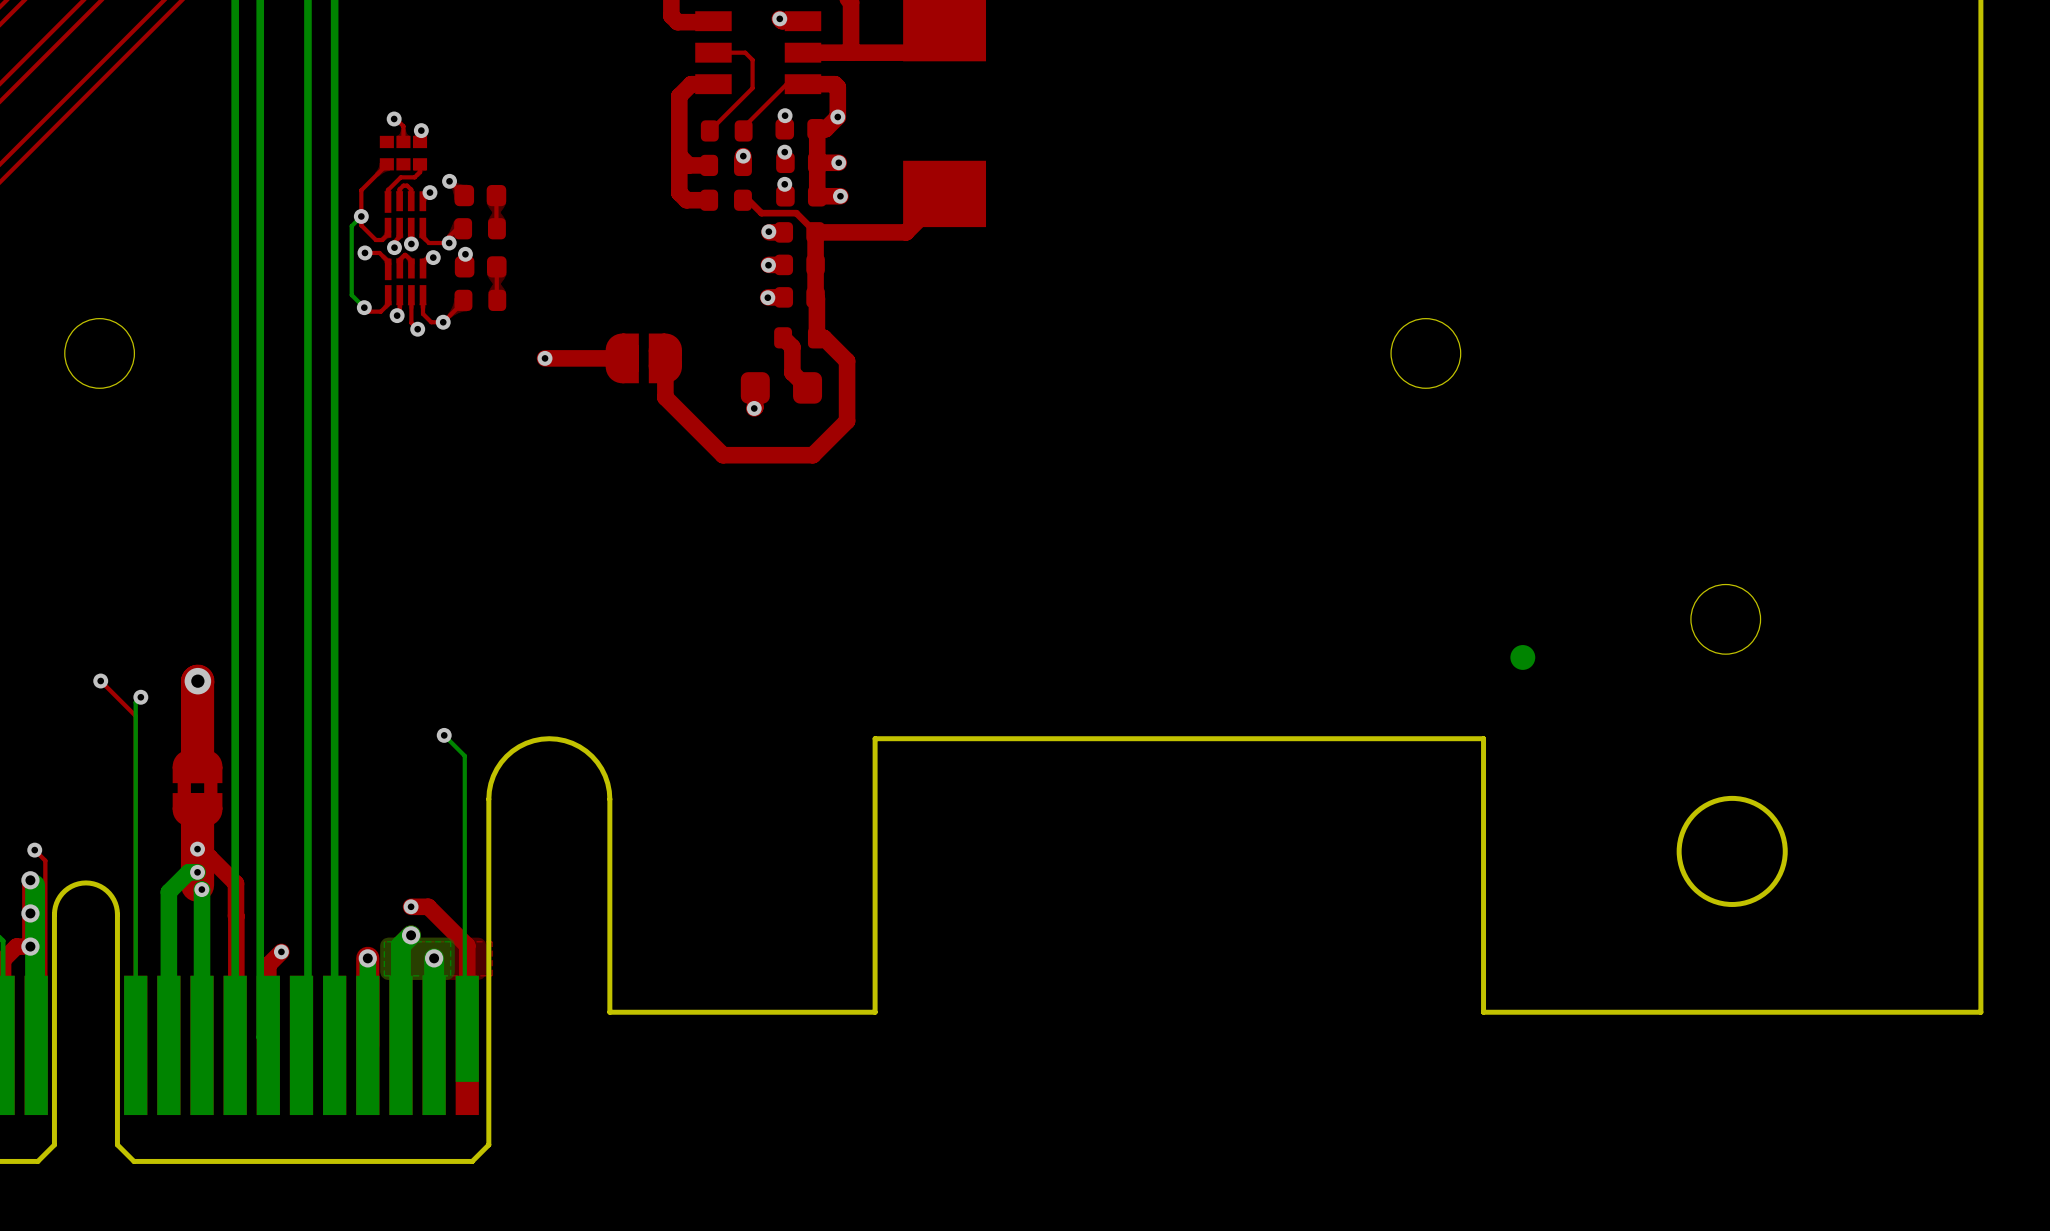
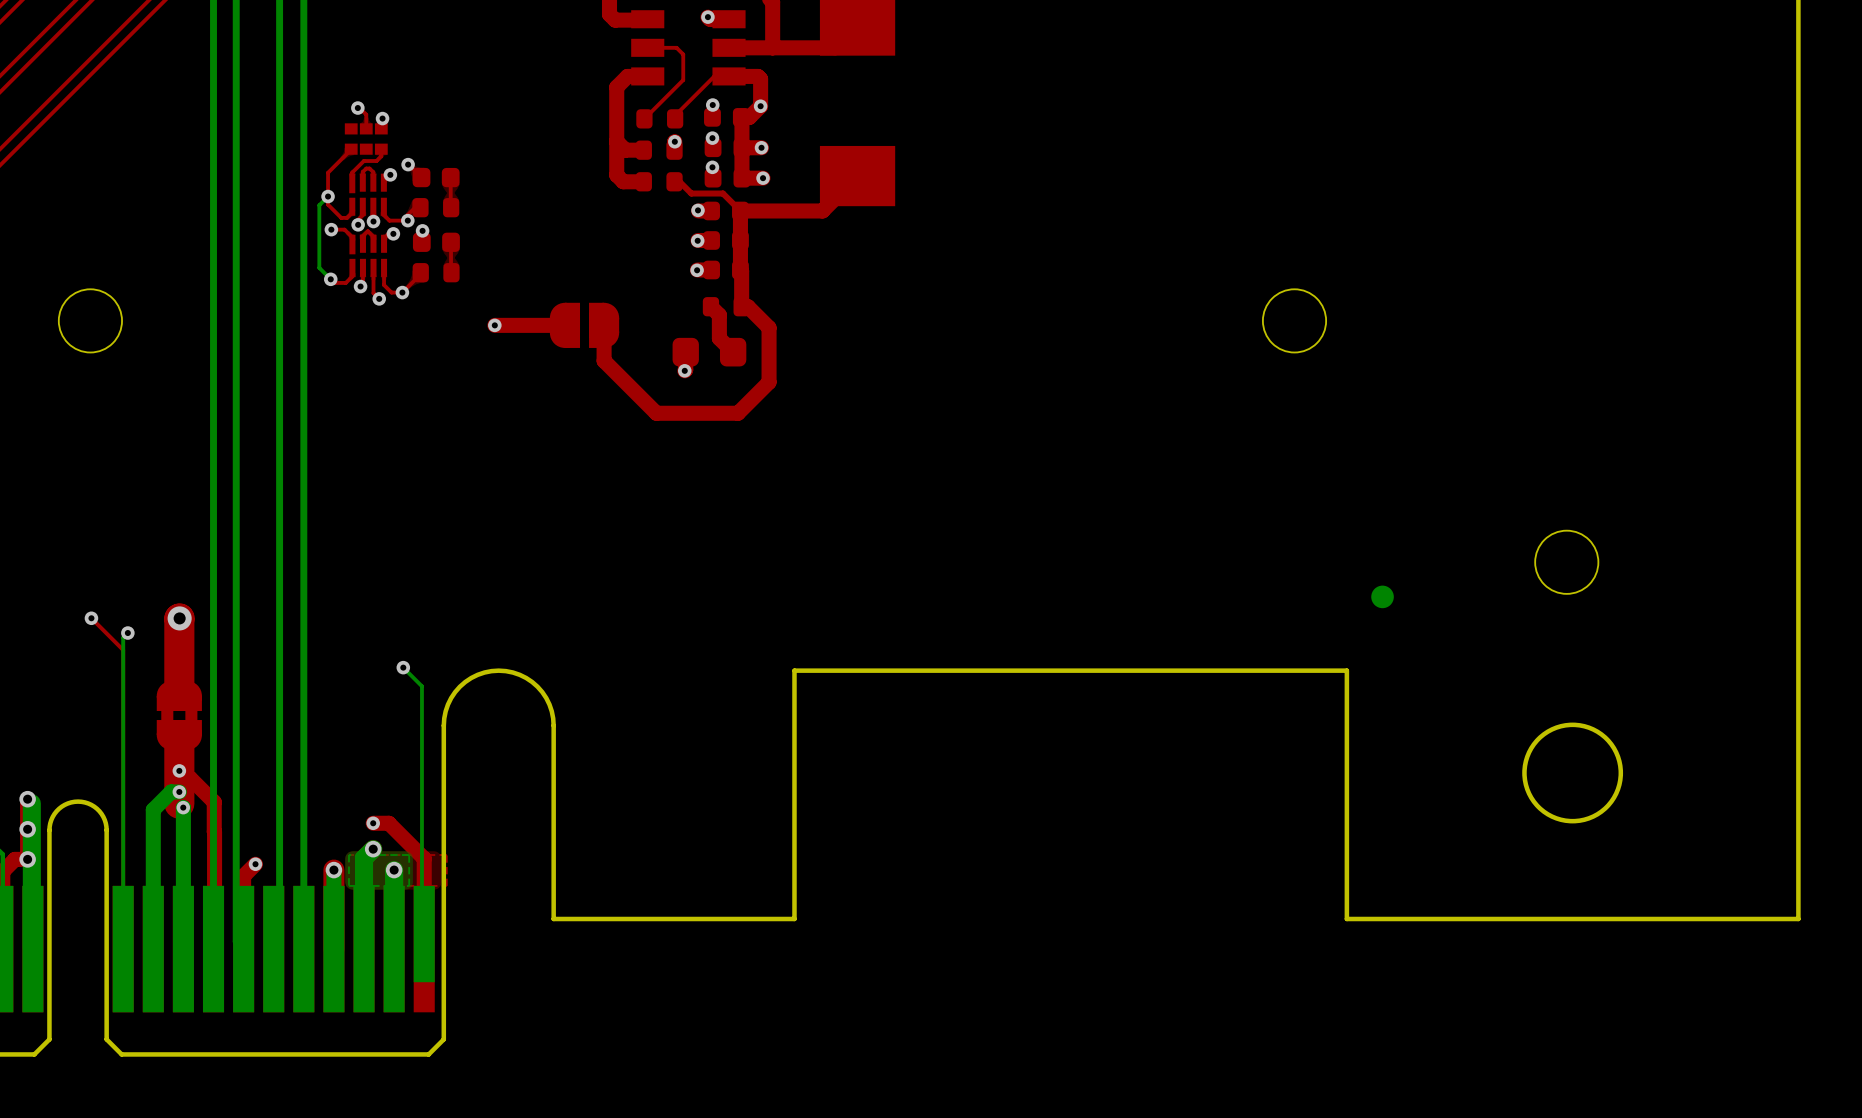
top track: (34, 850) (45, 860) (45, 1036) (36, 1045) -> none
via: (34, 850) -> none

